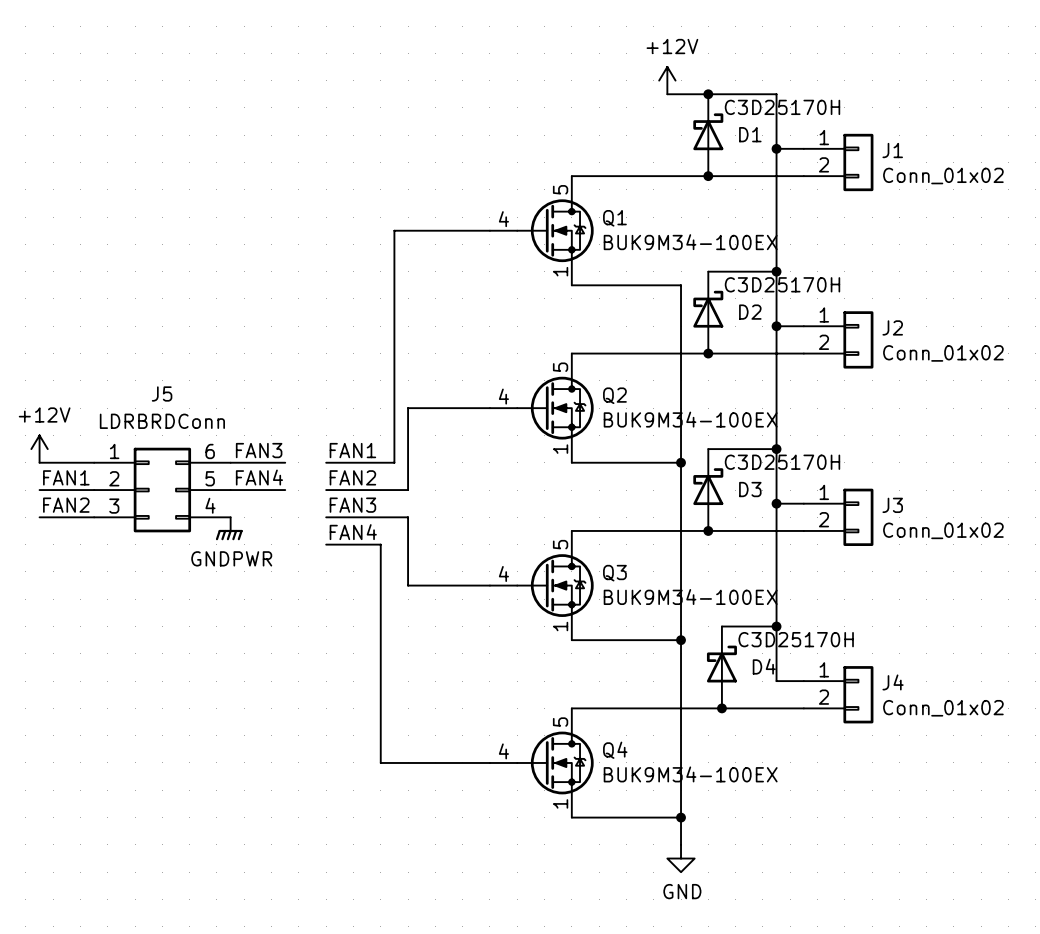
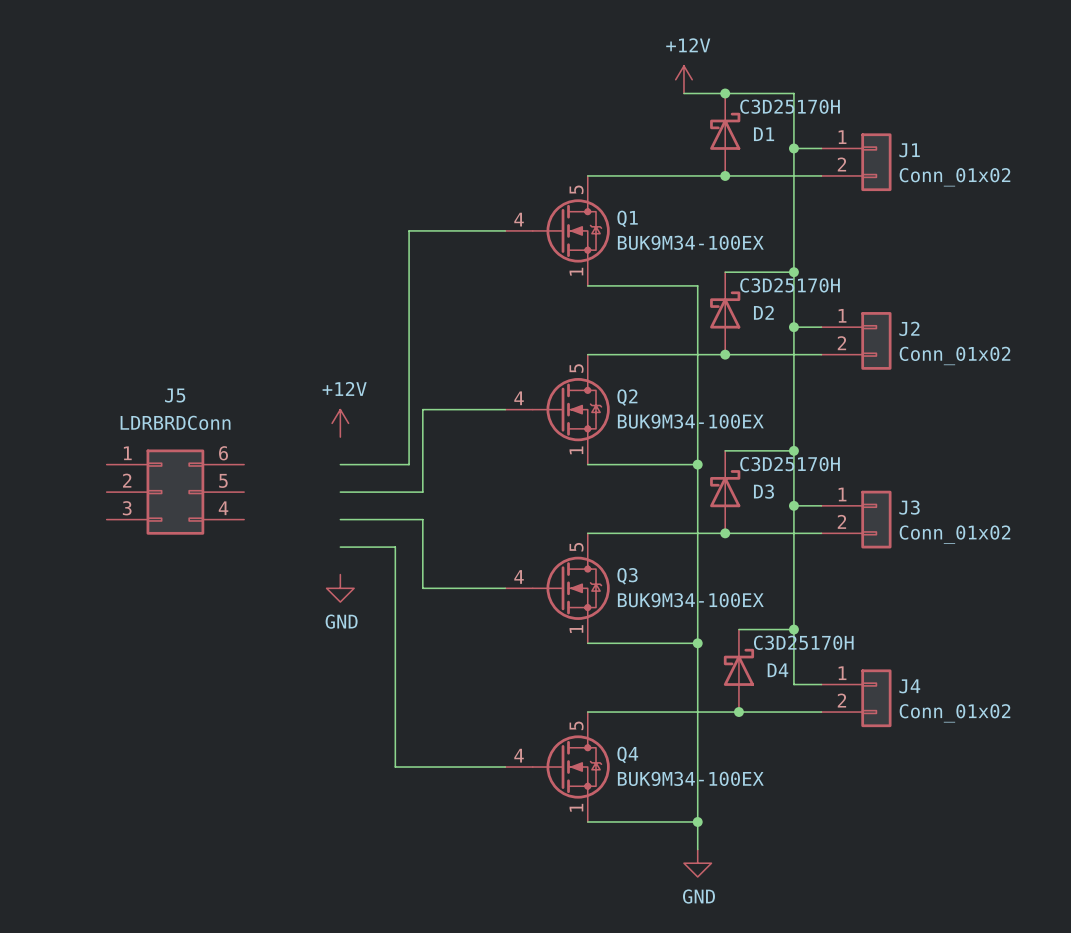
power symbol: none -> +12V (340, 423)
power symbol: +12V (39, 449) -> none
label: FAN3 (259, 450) -> none
label: FAN1 (352, 450) -> none
wire: (39, 462) (94, 462) -> none
wire: (230, 462) (285, 462) -> none
label: FAN1 (66, 477) -> none
label: FAN4 (259, 477) -> none
label: FAN2 (352, 477) -> none
wire: (39, 490) (94, 490) -> none
wire: (230, 490) (285, 490) -> none
label: FAN2 (66, 505) -> none
label: FAN3 (352, 505) -> none
wire: (39, 517) (94, 517) -> none
power symbol: GNDPWR (229, 528) -> none
label: FAN4 (353, 532) -> none
power symbol: none -> GND (340, 588)

